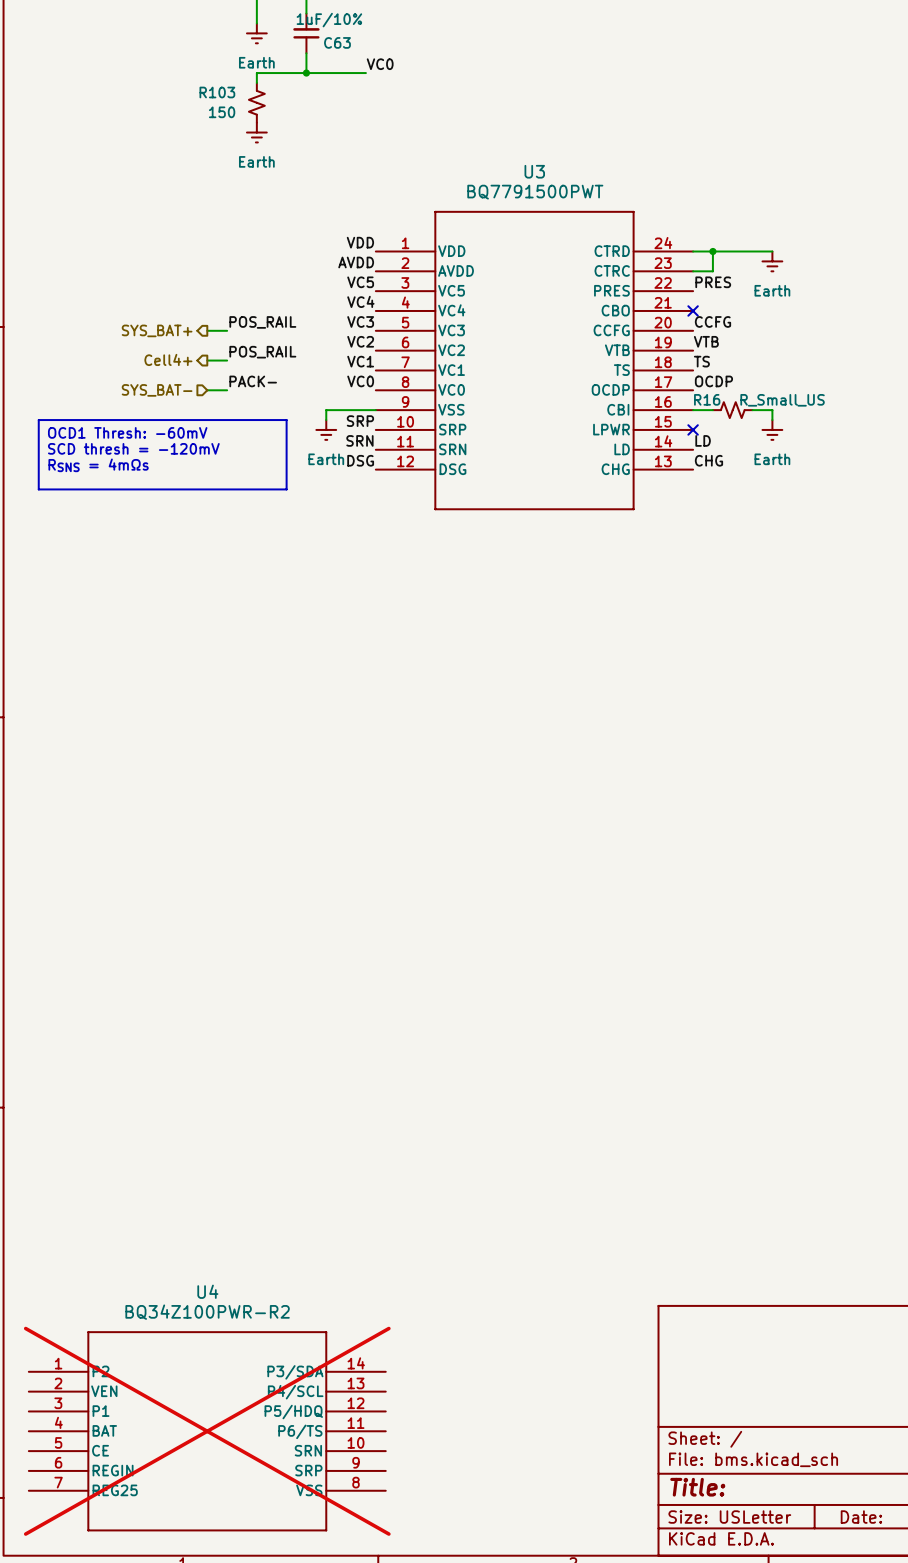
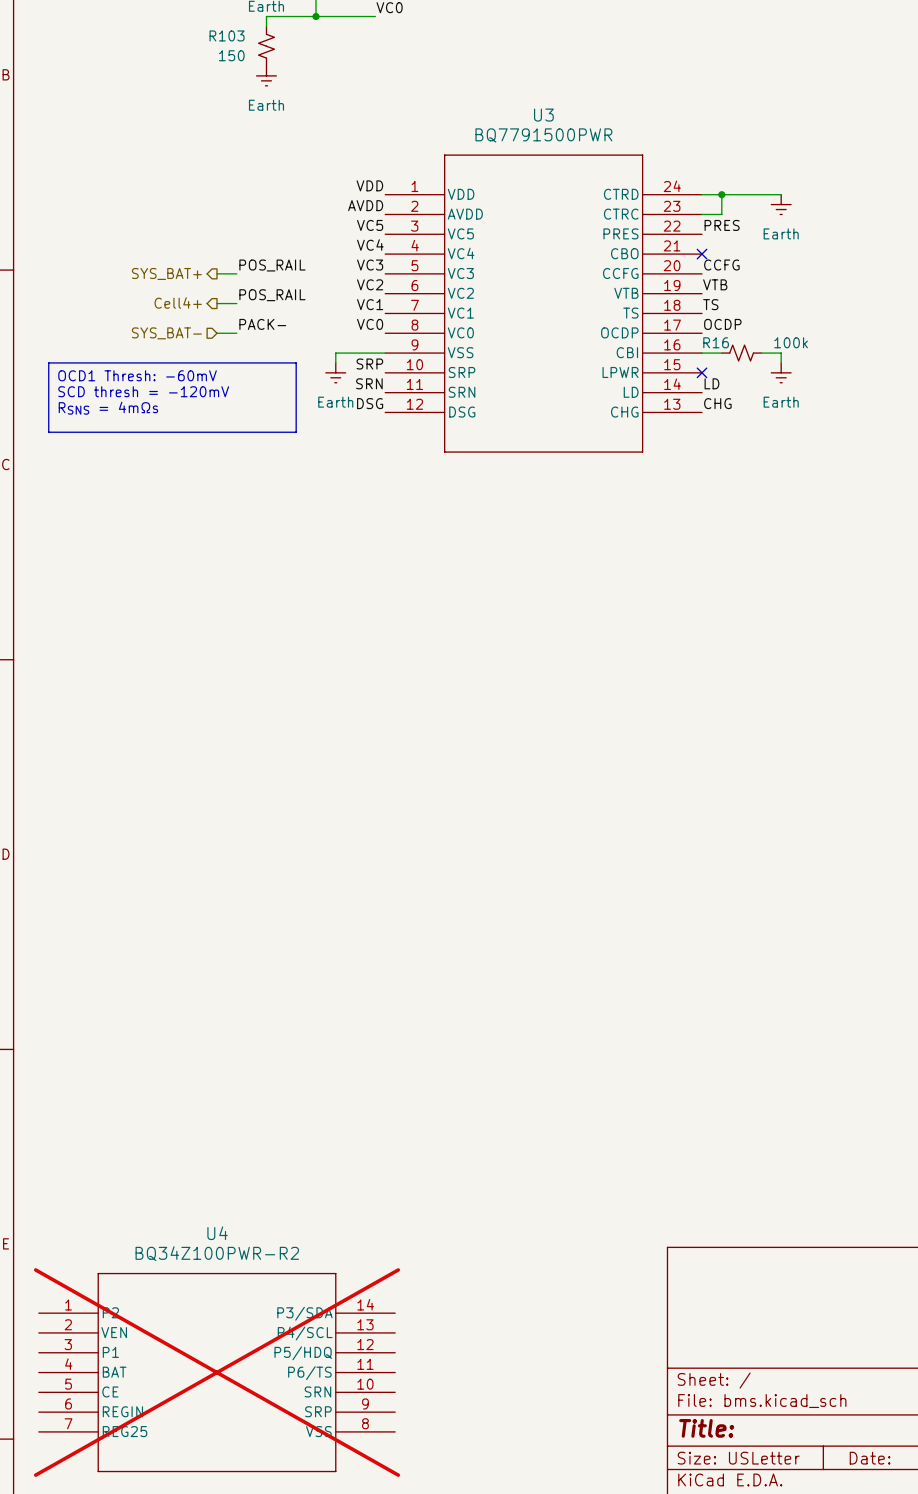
U3 value: BQ7791500PWT (535, 192) -> BQ7791500PWR (543, 135)
R16 value: R_Small_US (782, 400) -> 100k (791, 342)

